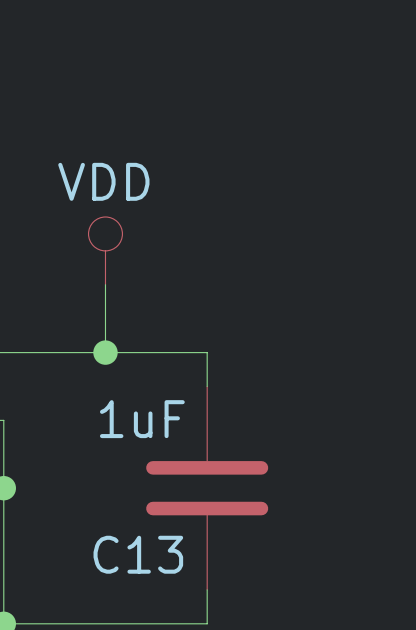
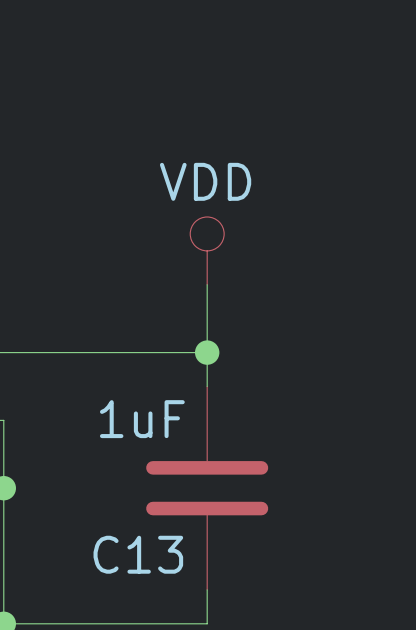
power symbol position: VDD (105, 250) -> VDD (207, 250)
wire: (105, 284) (105, 352) -> (207, 284) (207, 352)
junction position: (105, 352) -> (207, 352)

